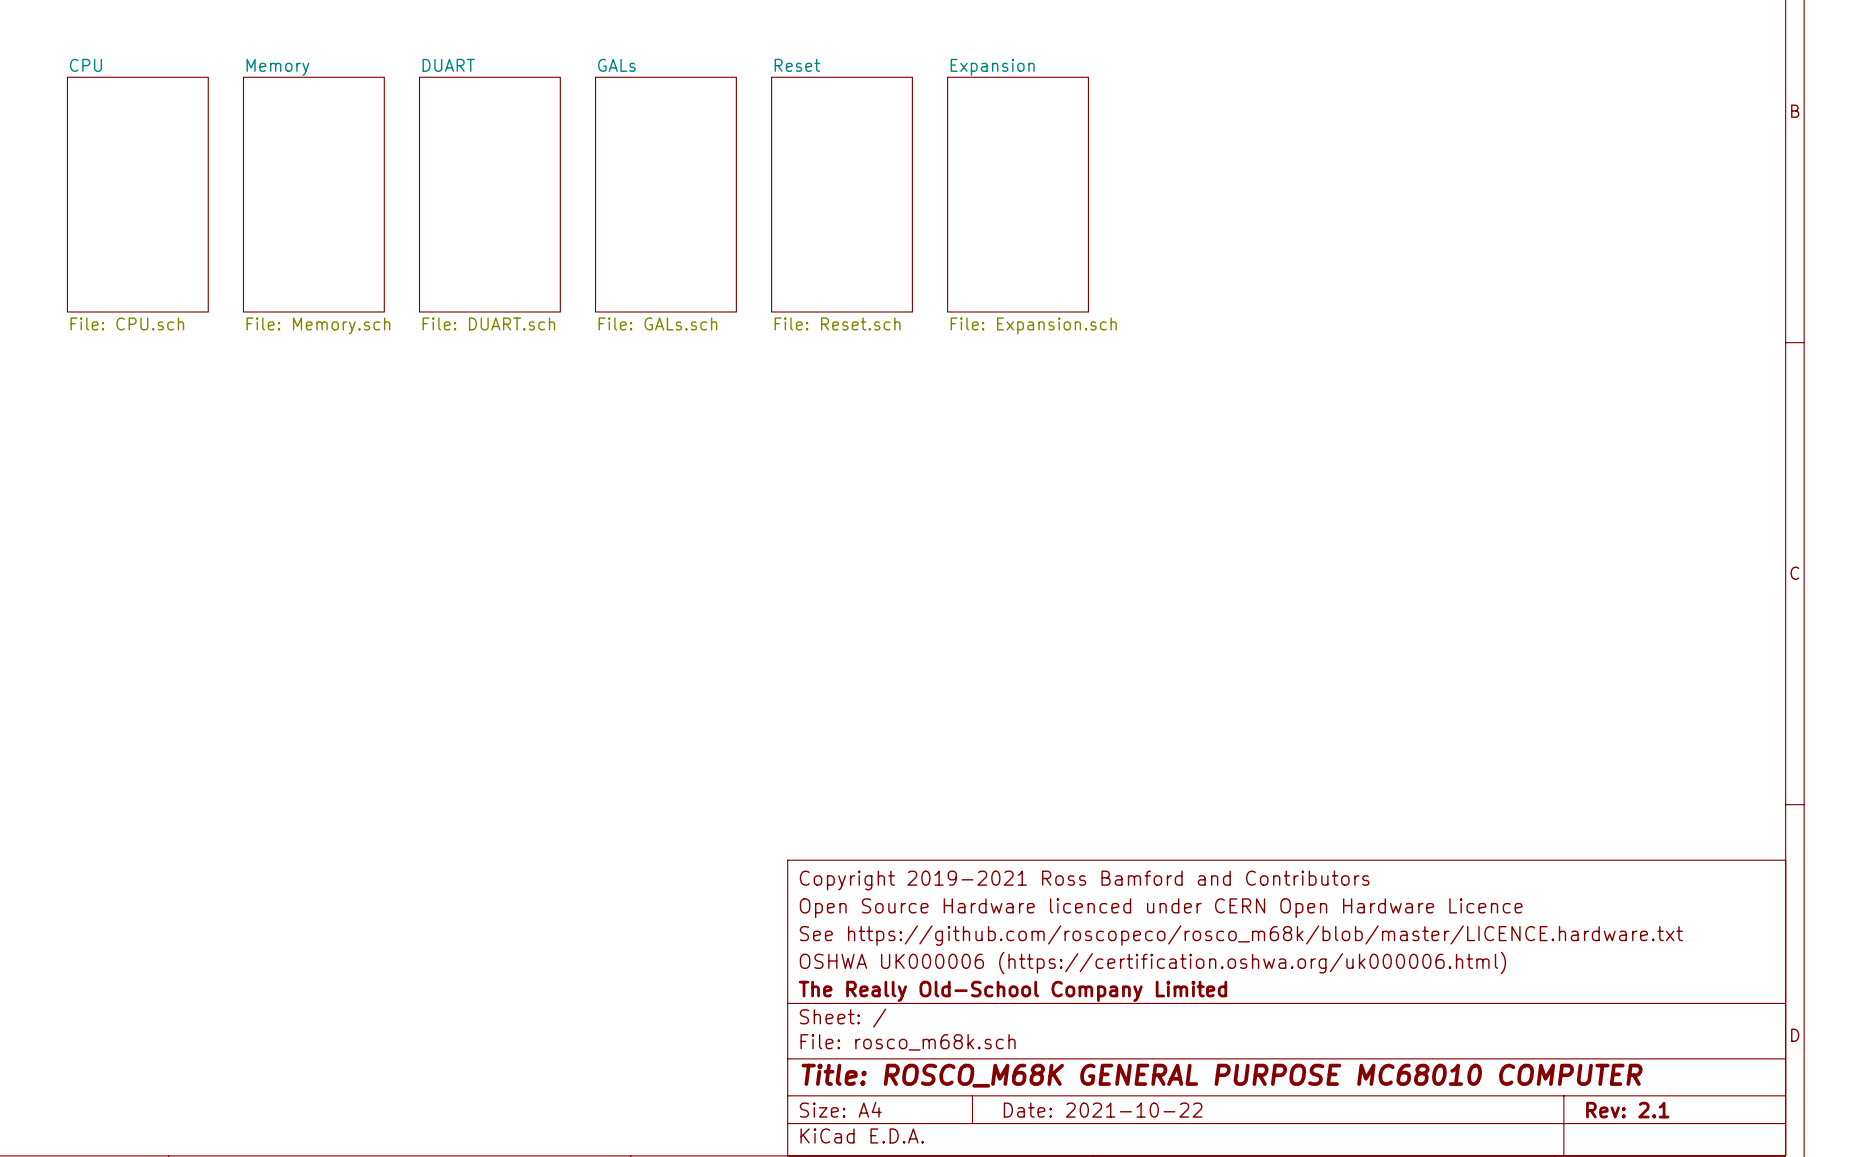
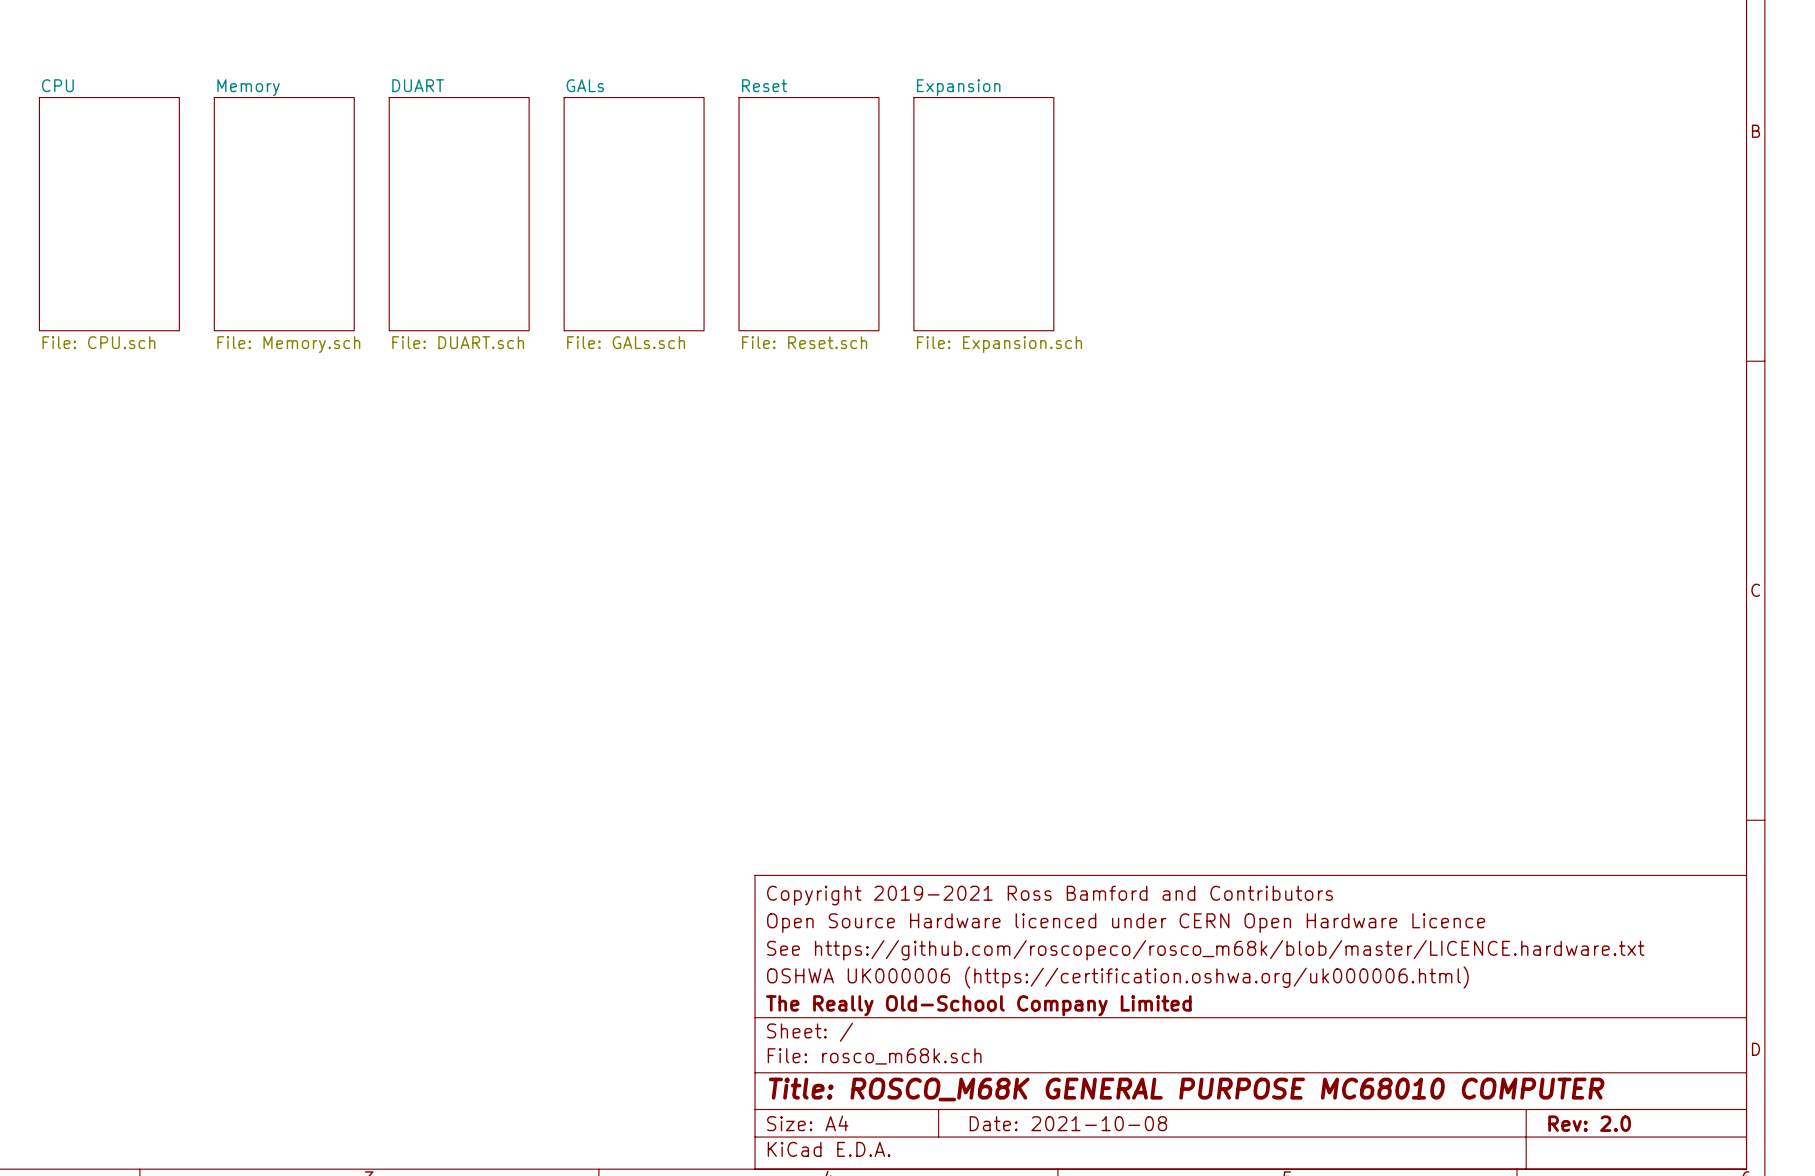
title block: Date: 2021-10-22 (1103, 1110) -> Date: 2021-10-08 (1068, 1123)
title block: Rev: 2.1 (1627, 1110) -> Rev: 2.0 (1589, 1123)

